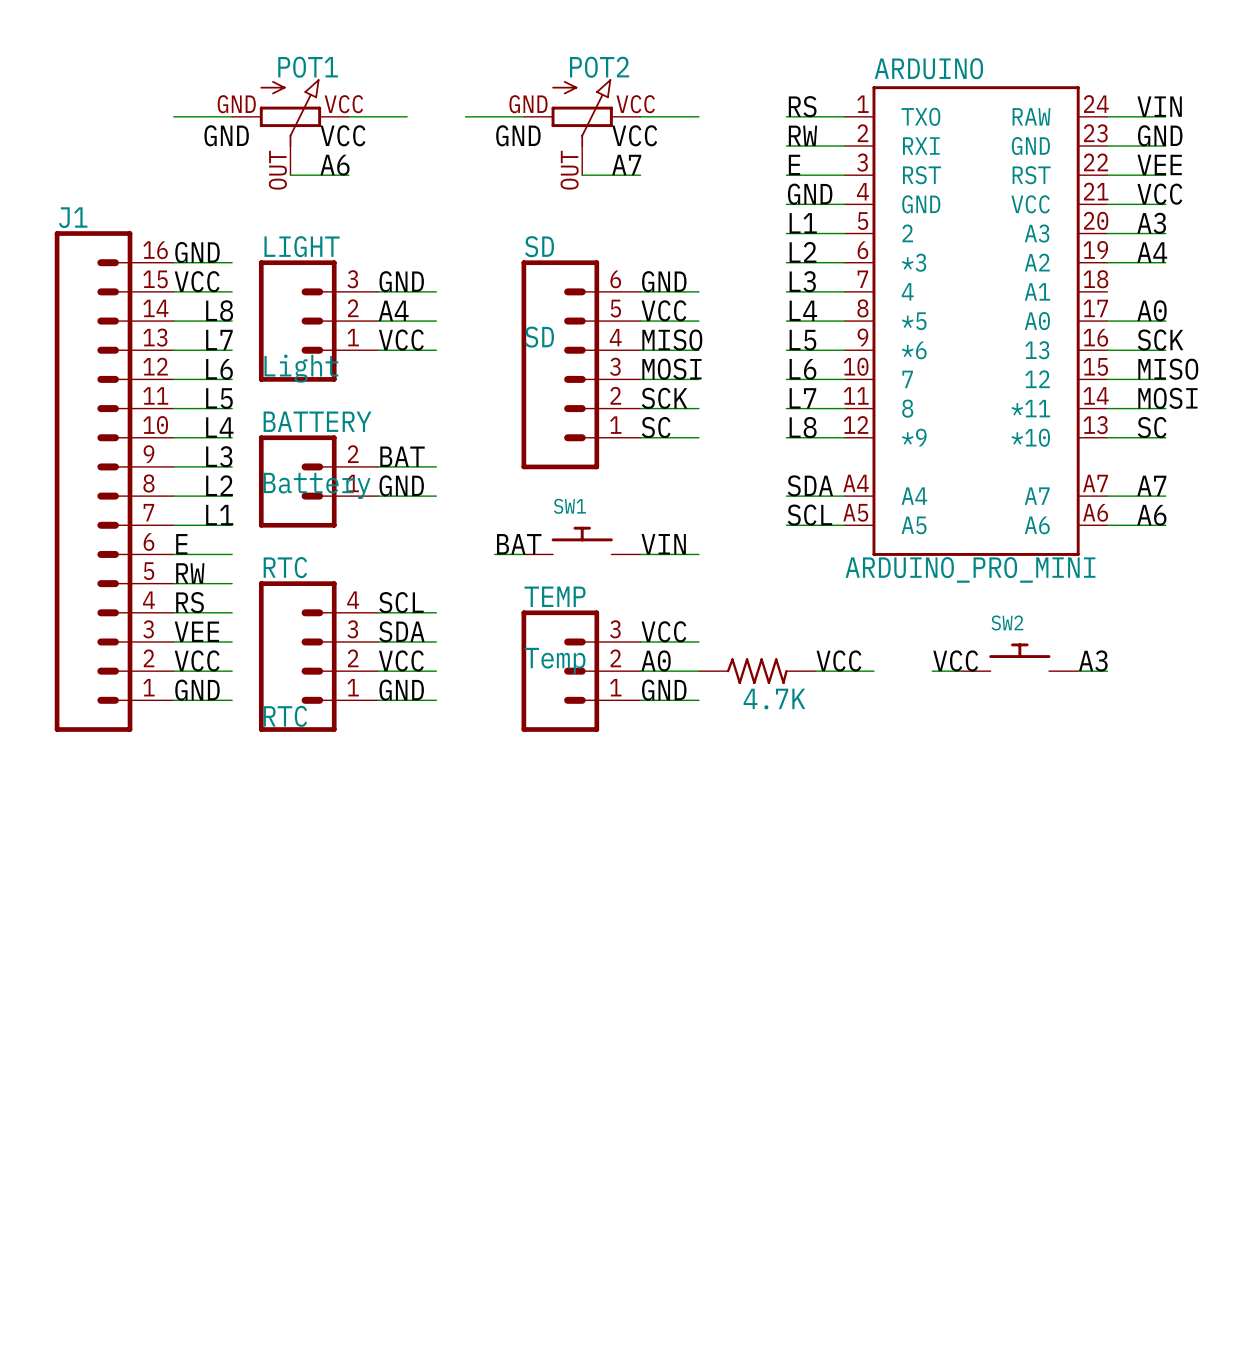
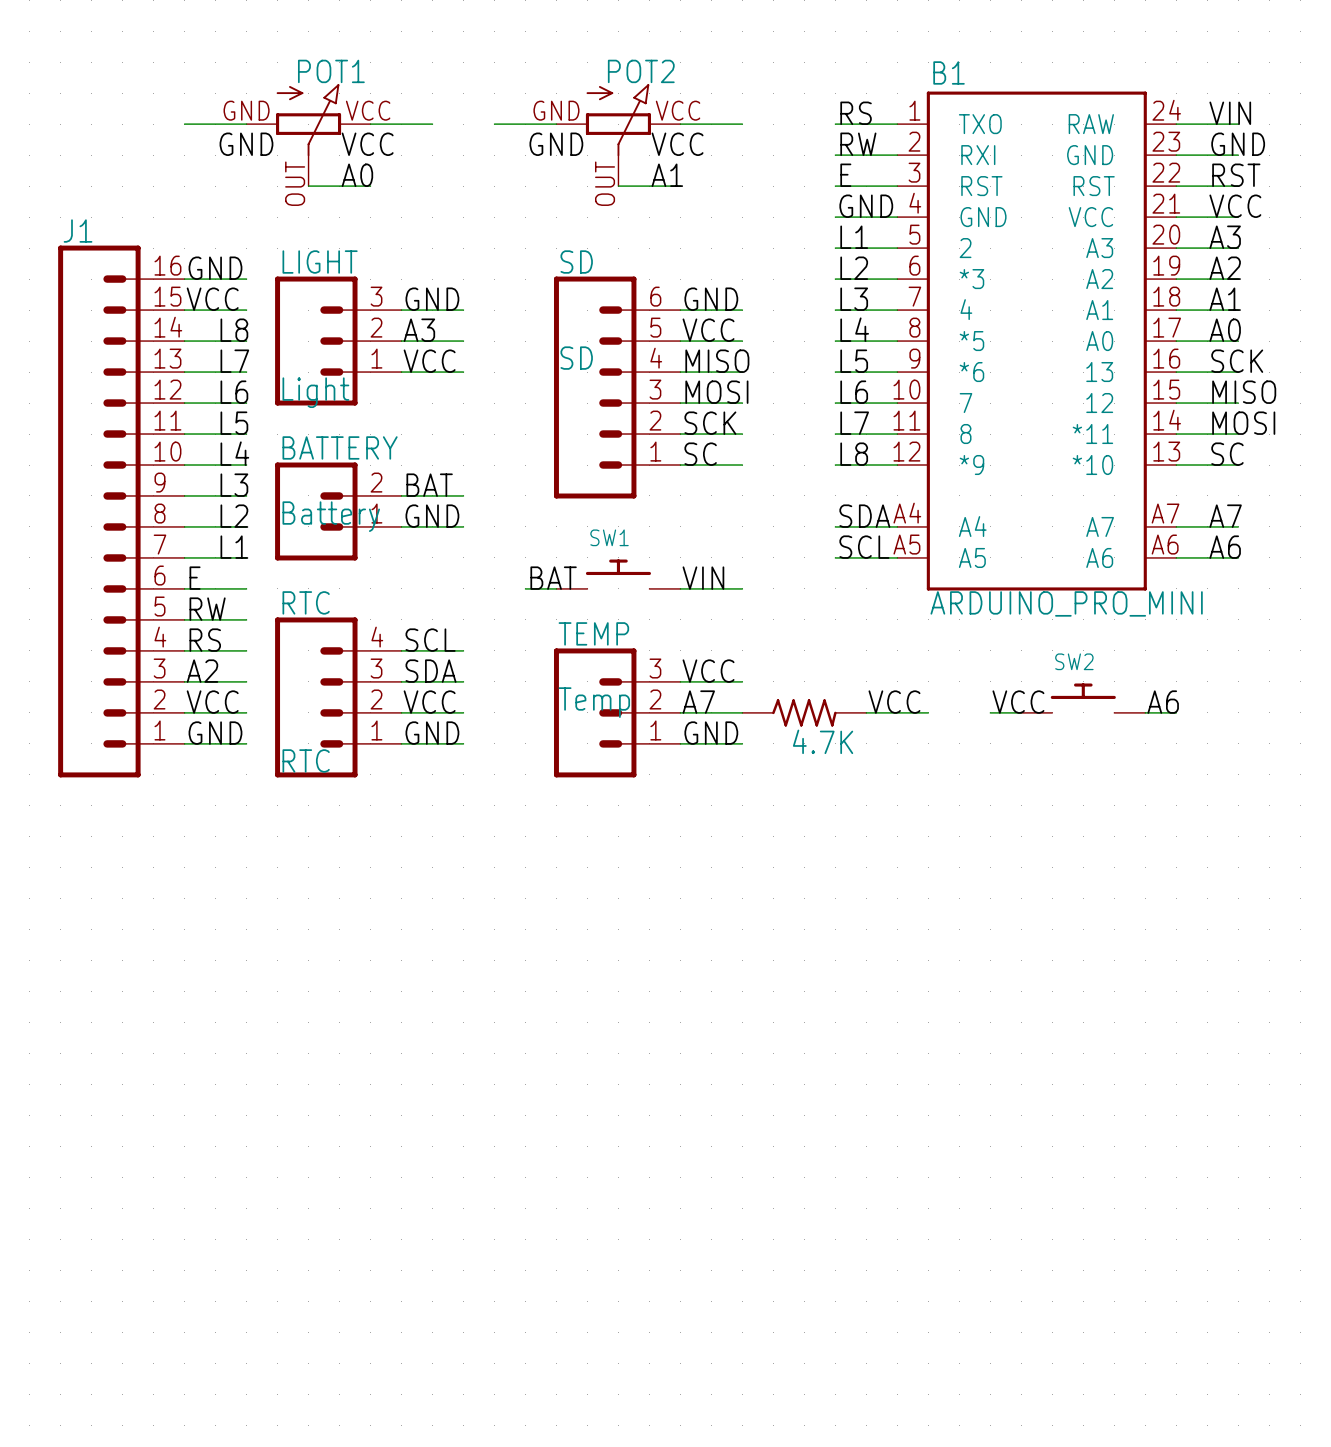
ARDUINO name: ARDUINO (928, 68) -> B1 (949, 72)
label: A7 (626, 164) -> A1 (667, 175)
label: VEE (1159, 164) -> RST (1236, 175)
label: A6 (335, 165) -> A0 (357, 175)
label: A4 (1152, 252) -> A2 (1225, 268)
label: none -> A1 (1225, 299)
wire: none -> (1176, 310) (1238, 310)
label: A4 (393, 310) -> A3 (419, 330)
ARDUINO value position: ARDUINO_PRO_MINI (970, 569) -> ARDUINO_PRO_MINI (1066, 603)
label: VEE (196, 631) -> A2 (202, 671)
label: A0 (656, 660) -> A7 (698, 702)
label: A3 (1093, 660) -> A6 (1163, 702)

